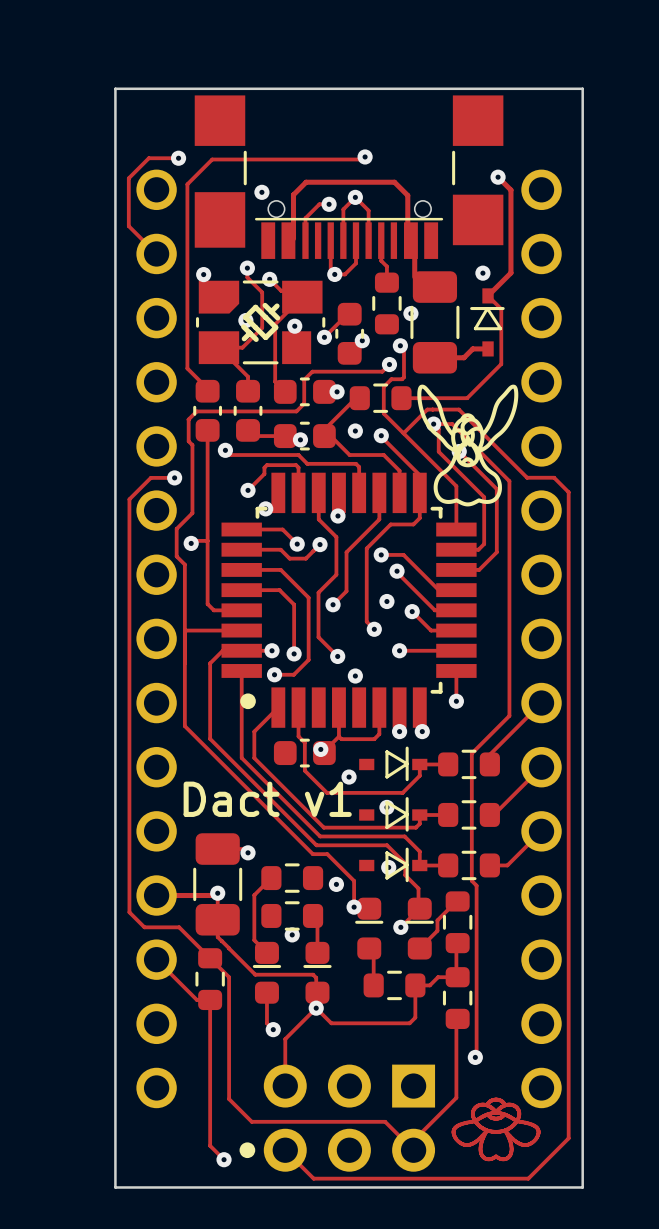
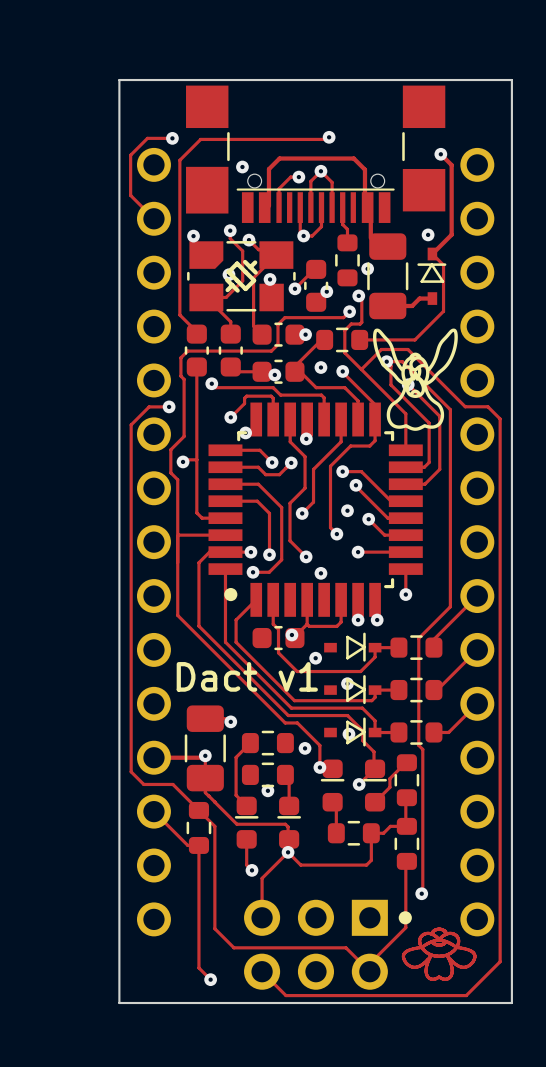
part: (337, 1118) -> none
part: none -> (327, 944)

